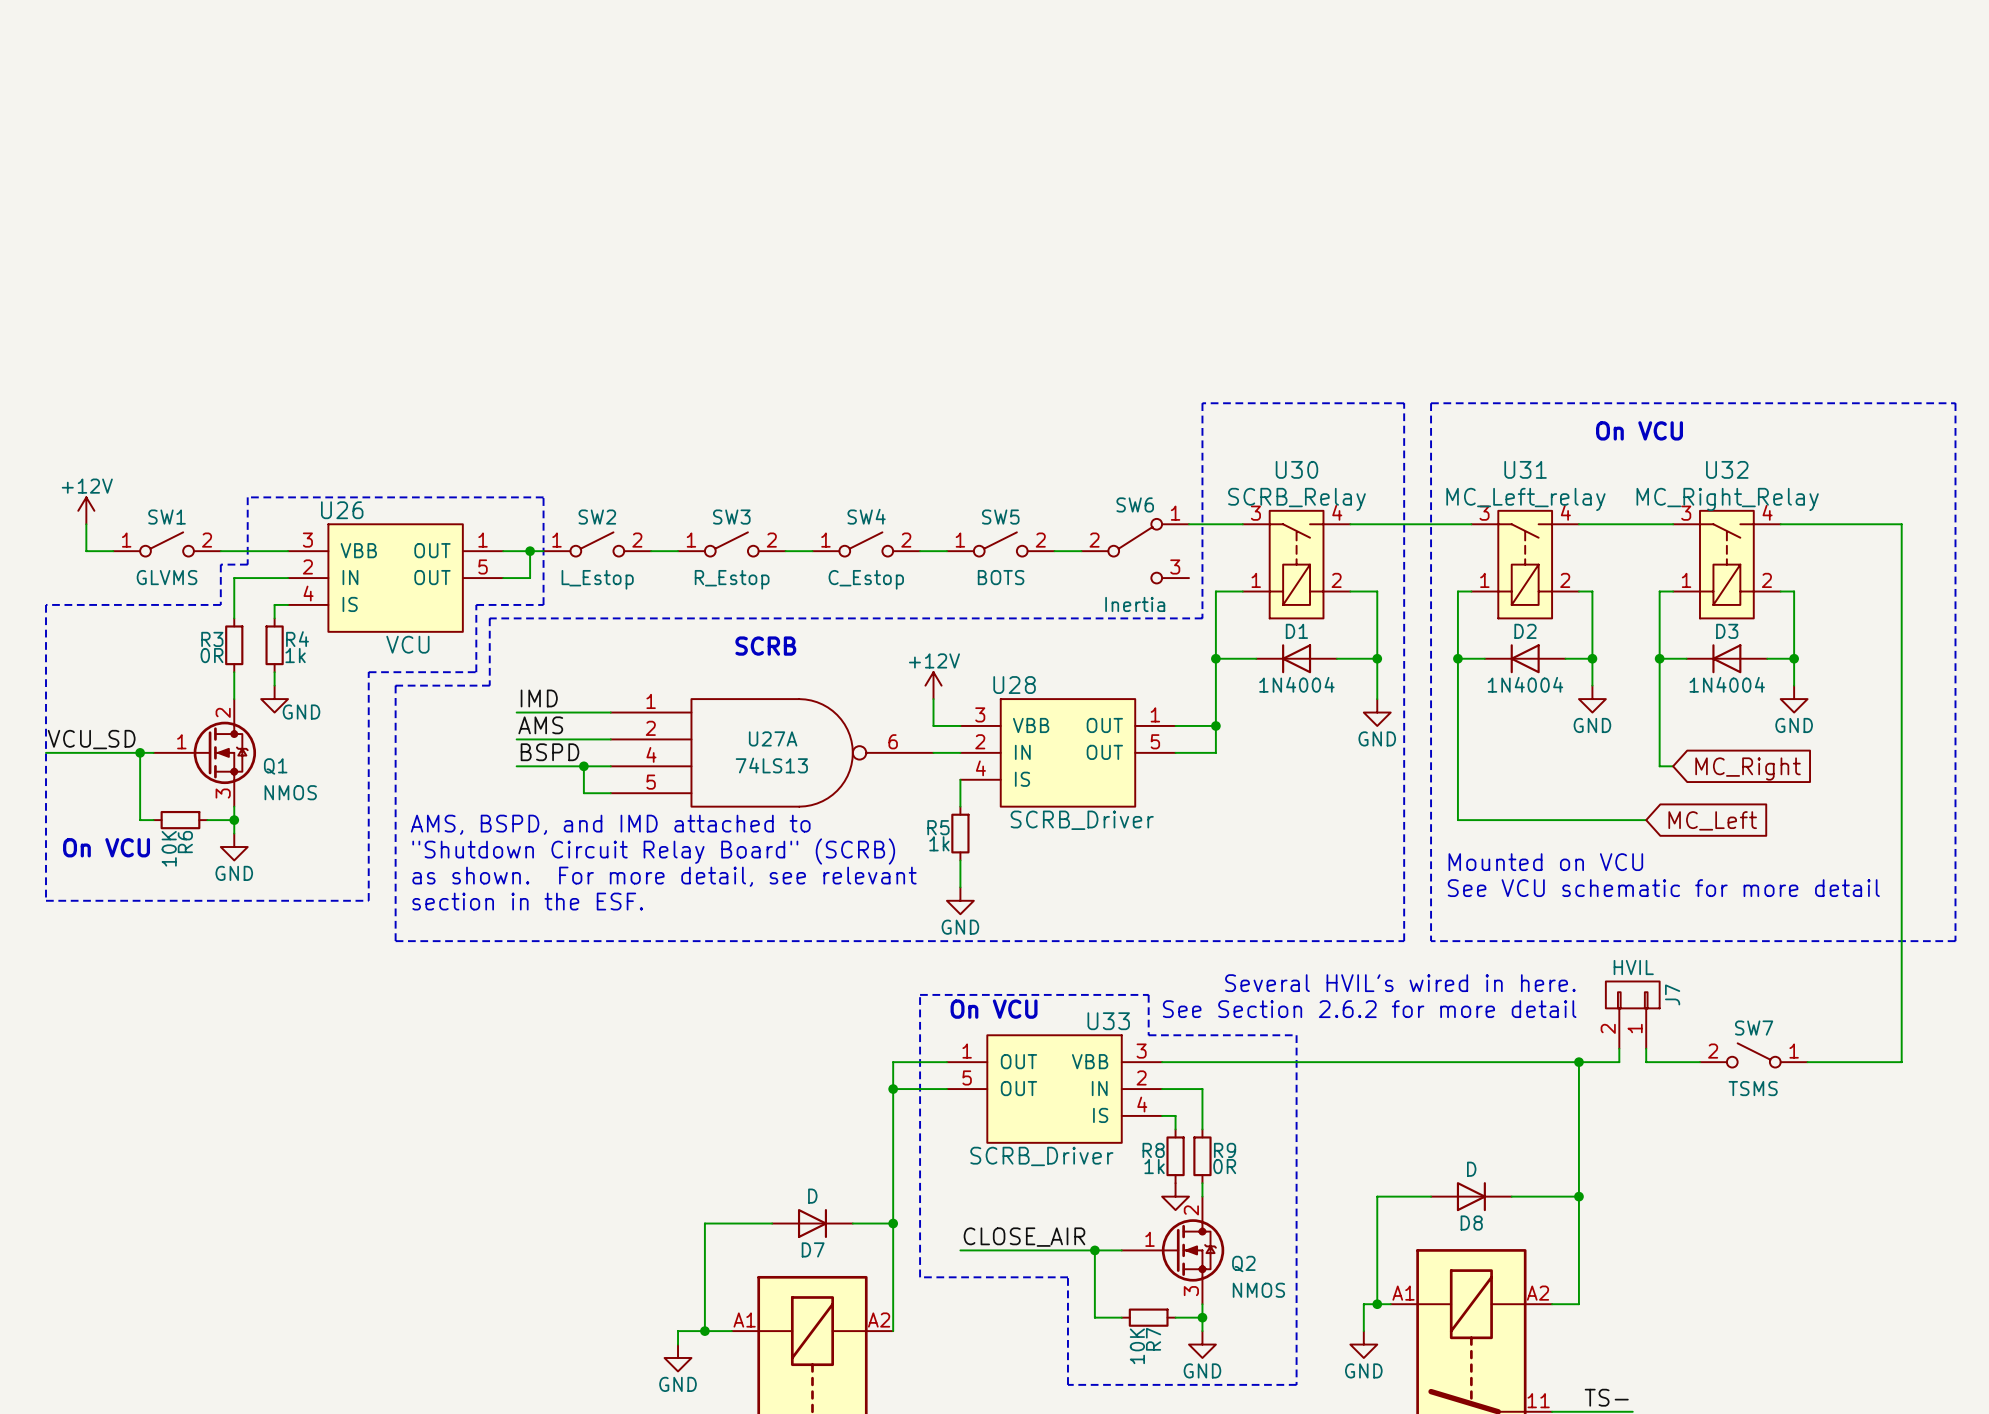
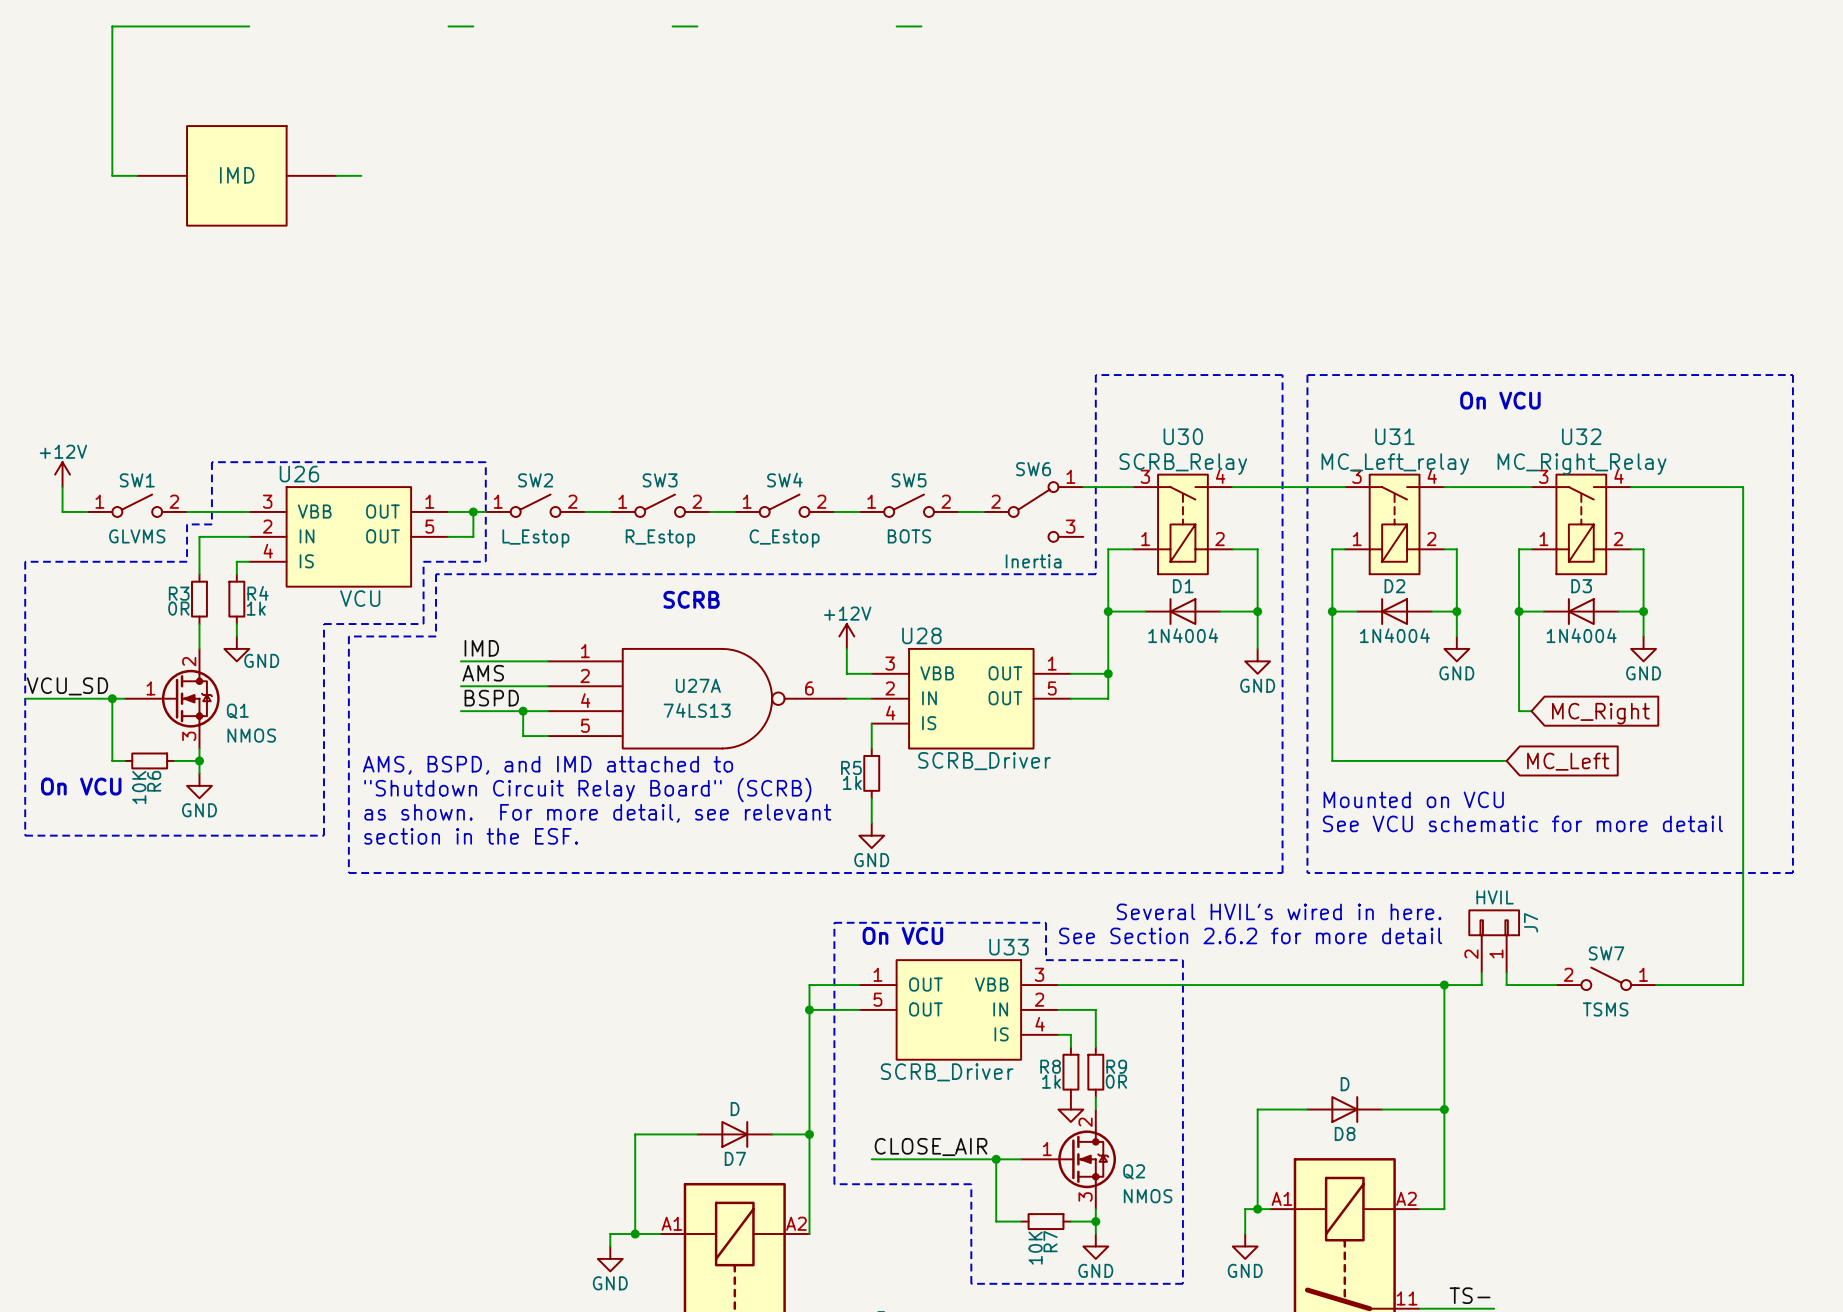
wire: none -> (249, 26) (112, 26) (112, 175) (137, 175)
wire: none -> (448, 26) (473, 26)
wire: none -> (672, 26) (697, 26)
wire: none -> (896, 26) (921, 26)
part: none -> IMD (236, 175)
wire: none -> (336, 175) (361, 175)

